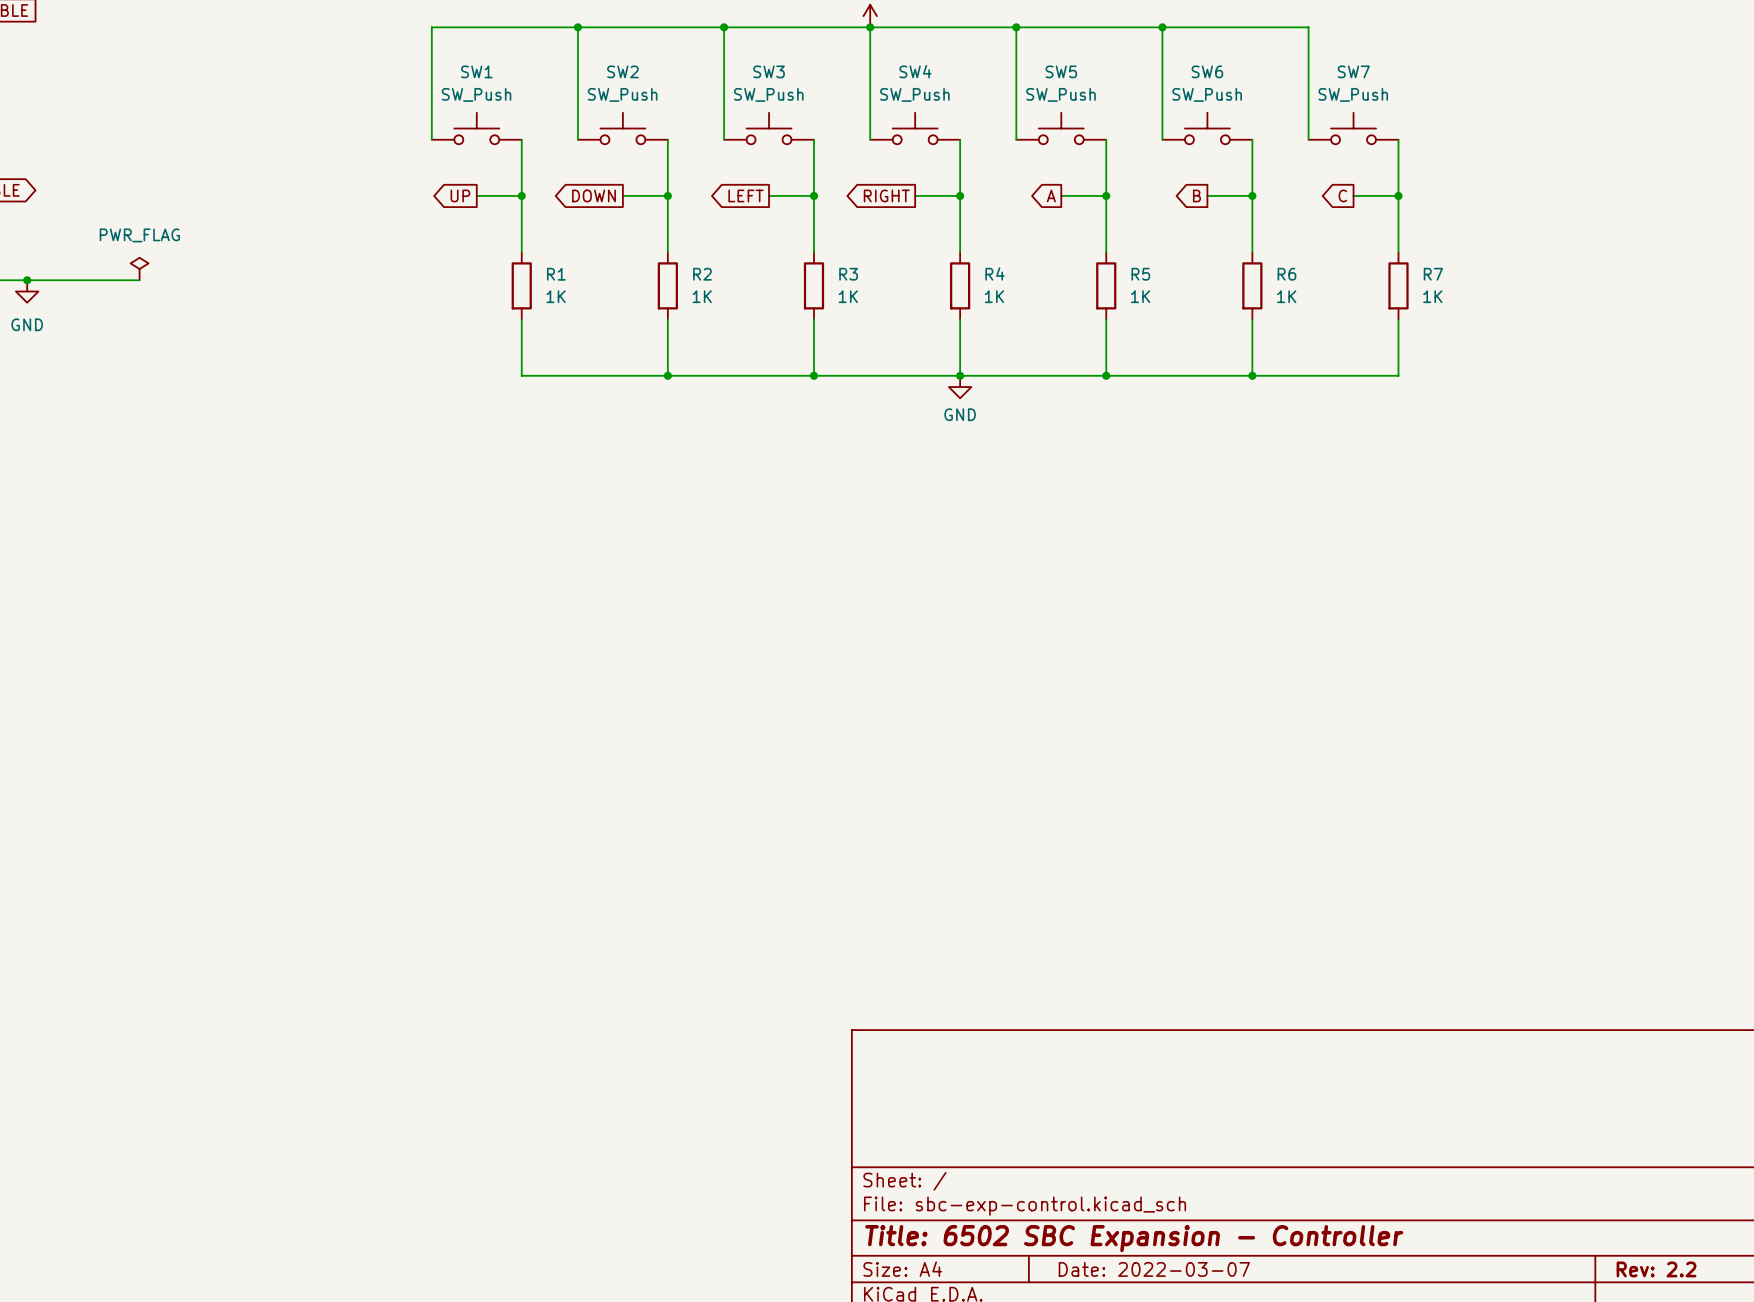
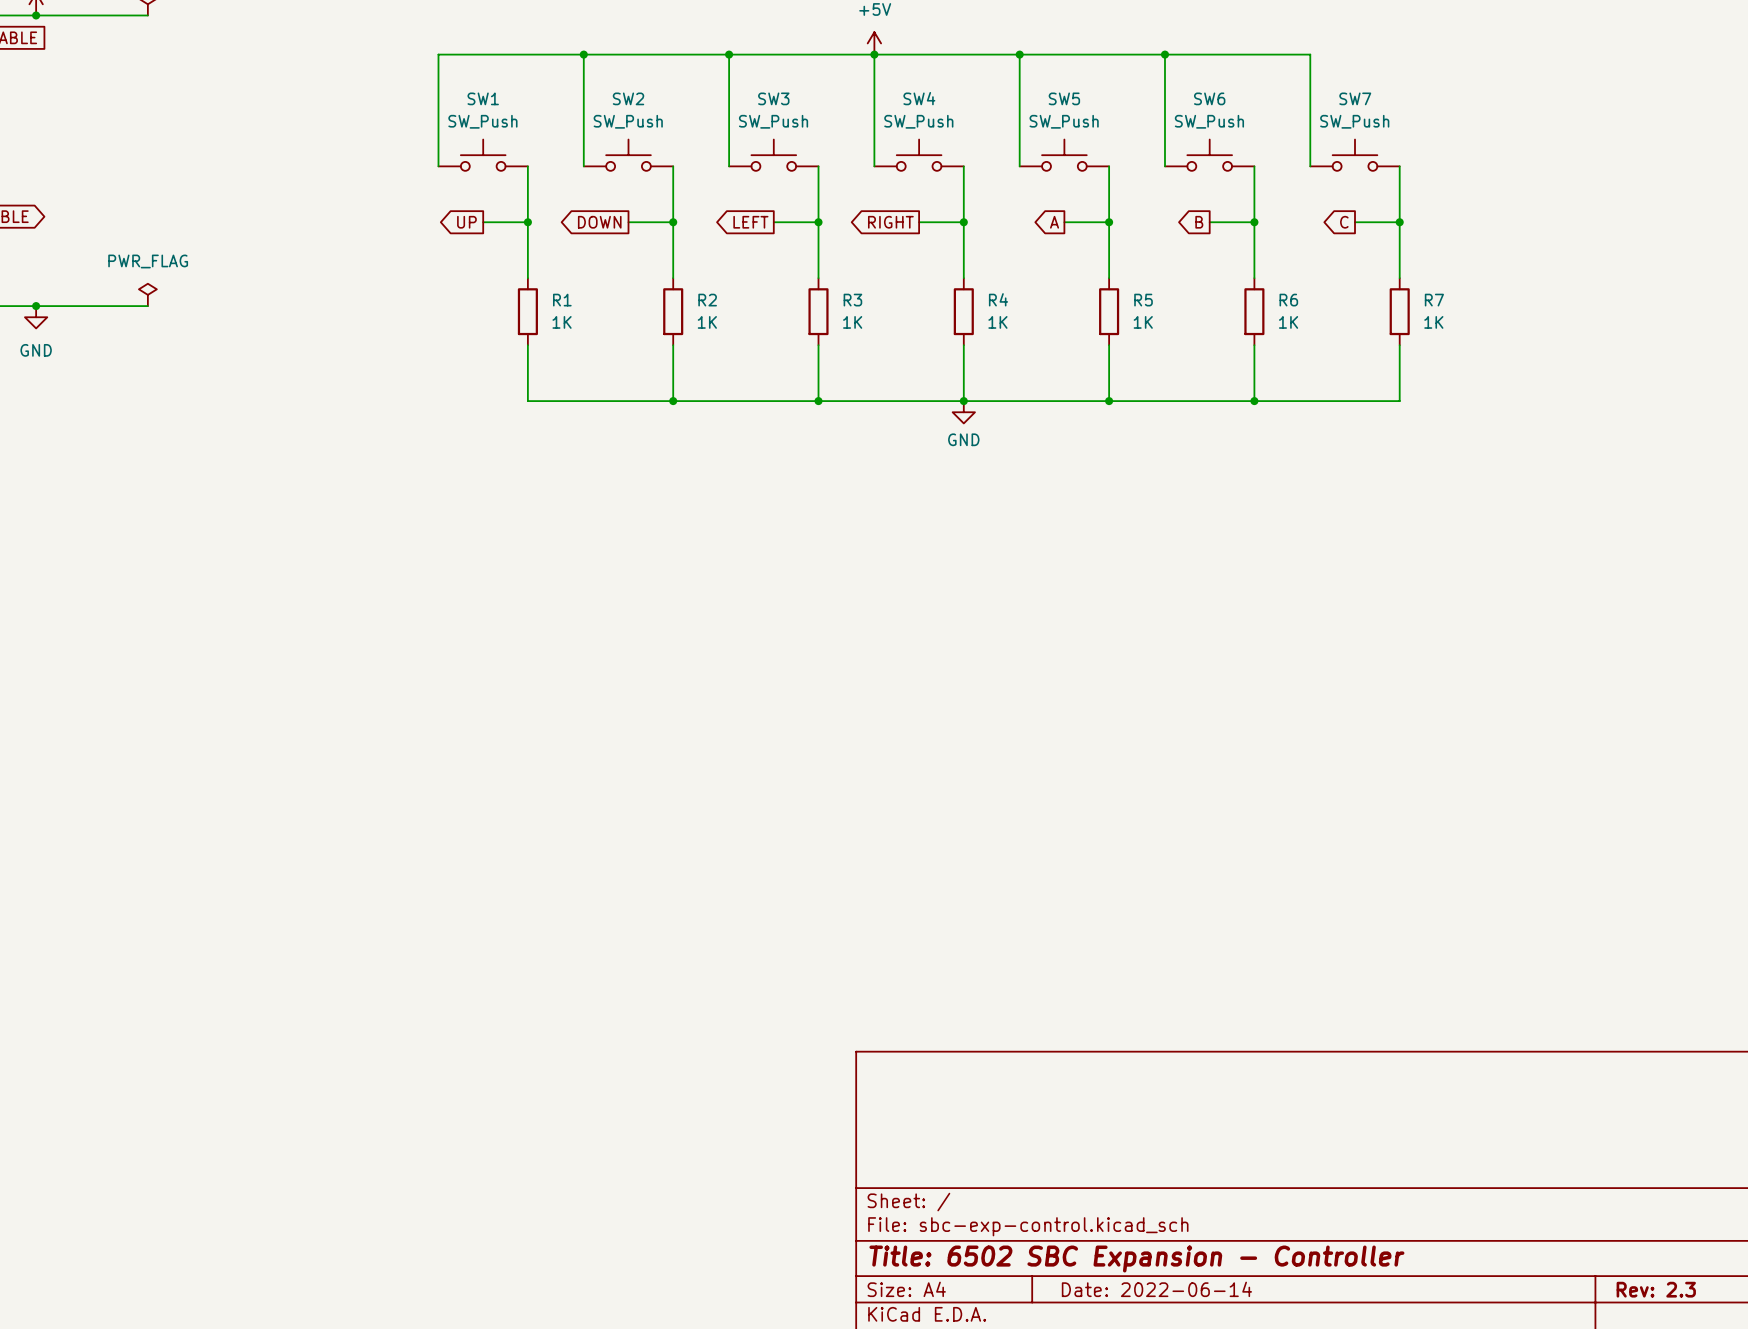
title block: Date: 2022-03-07 (1154, 1269) -> Date: 2022-06-14 (1156, 1289)
title block: Rev: 2.2 (1656, 1269) -> Rev: 2.3 (1656, 1289)

